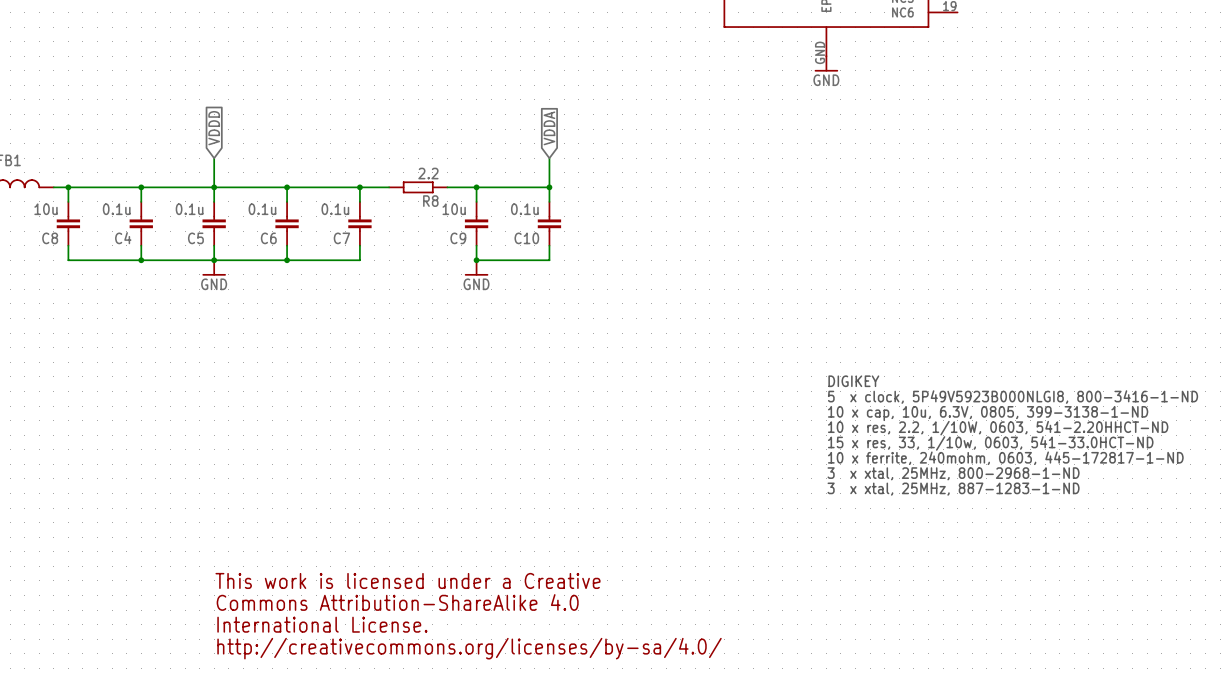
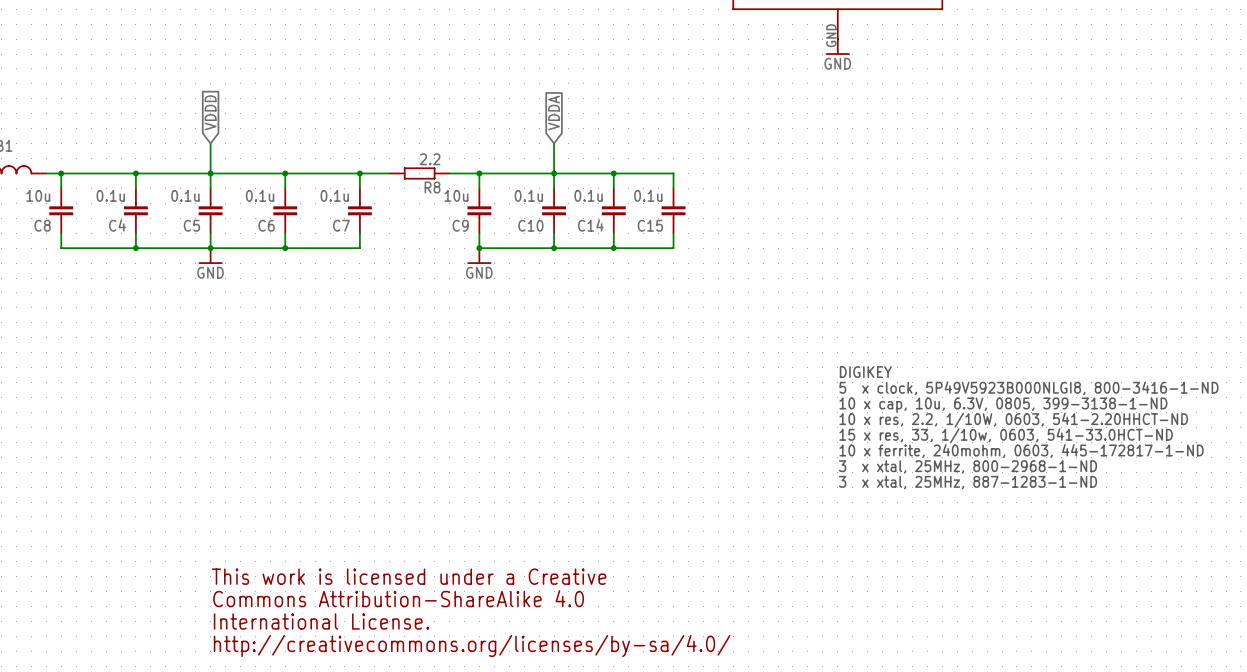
wire: none -> (554, 173) (673, 173) (673, 188)
wire: none -> (613, 173) (613, 188)
junction: none -> (613, 173)
C14: none -> 0.1u (613, 210)
C15: none -> 0.1u (673, 210)
wire: none -> (613, 233) (613, 248)
wire: none -> (673, 233) (673, 248) (554, 248)
junction: none -> (554, 248)
junction: none -> (613, 248)

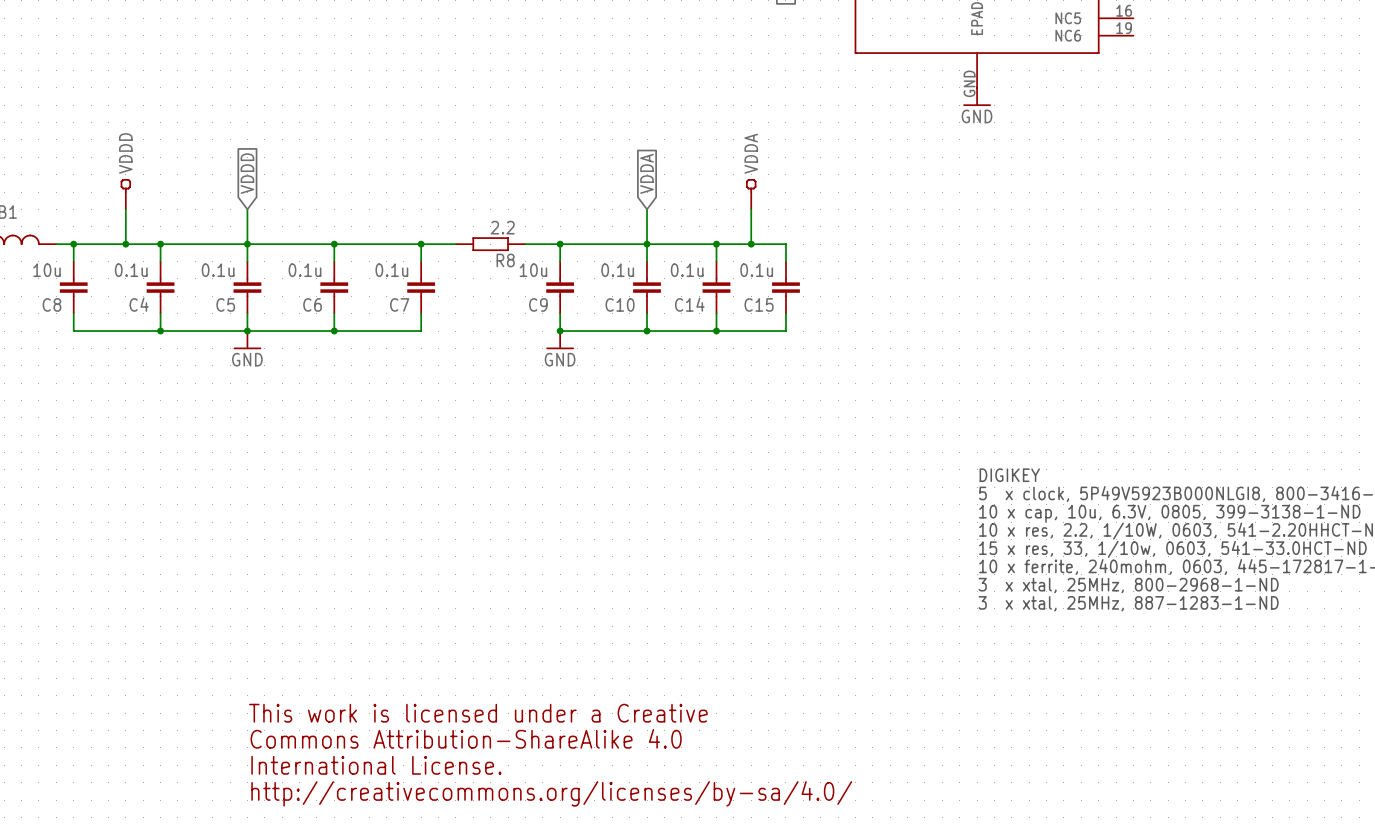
VDDD: none -> (125, 194)
VDDA: none -> (751, 194)
wire: none -> (125, 209) (125, 244)
wire: none -> (751, 209) (751, 244)
junction: none -> (125, 244)
junction: none -> (751, 244)

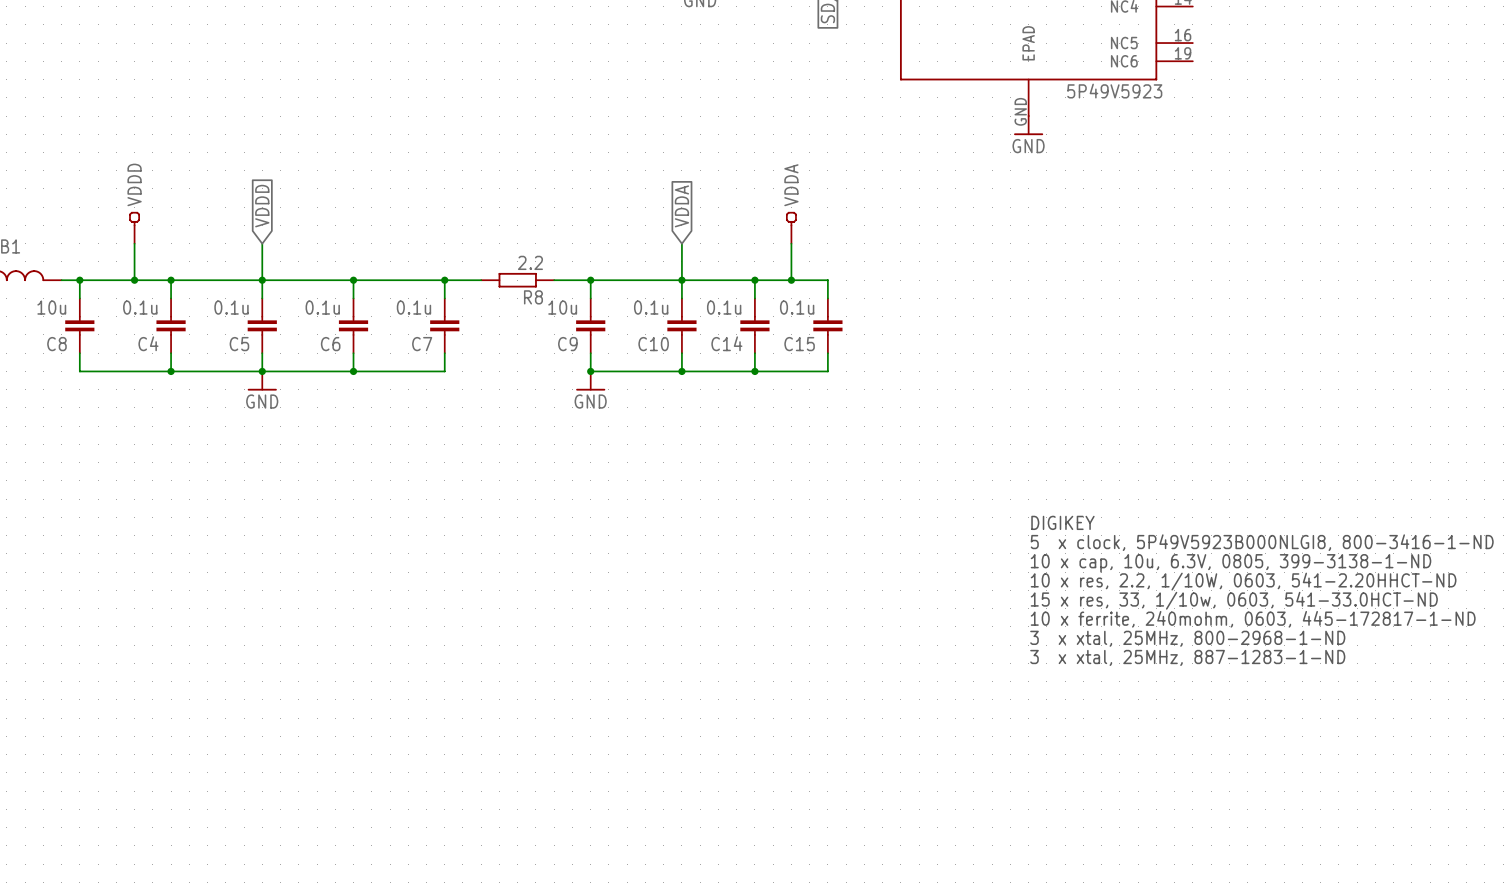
part value: none -> 5P49V5923 (1114, 91)
text: This work is licensed under a Creative (478, 713) -> none
text: Commons Attribution-ShareAlike 4.0 (466, 738) -> none
text: International License. (376, 765) -> none
text: http://creativecommons.org/licenses/by-sa/4.0/ (551, 793) -> none

